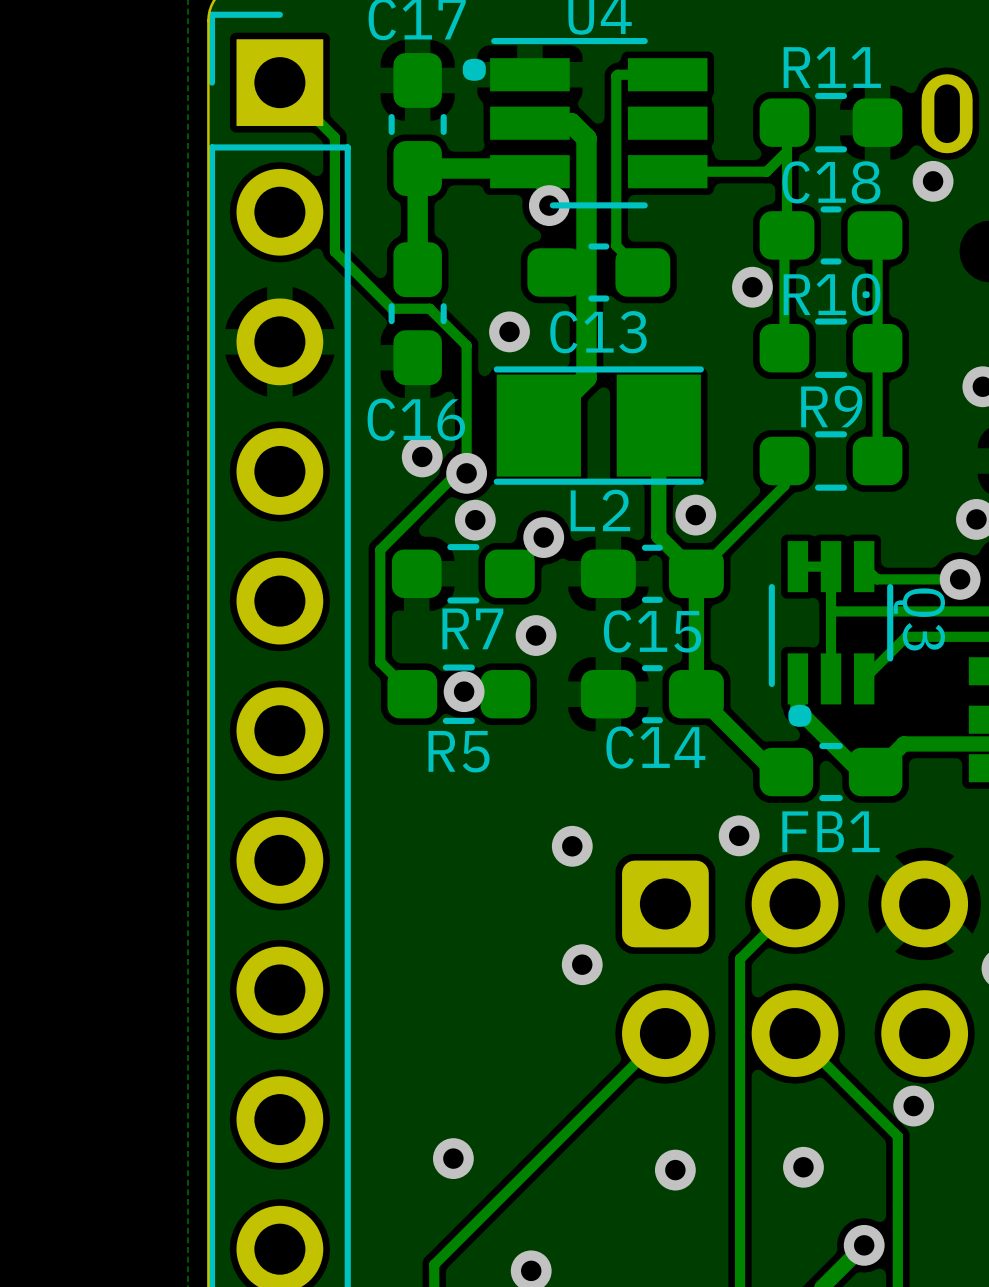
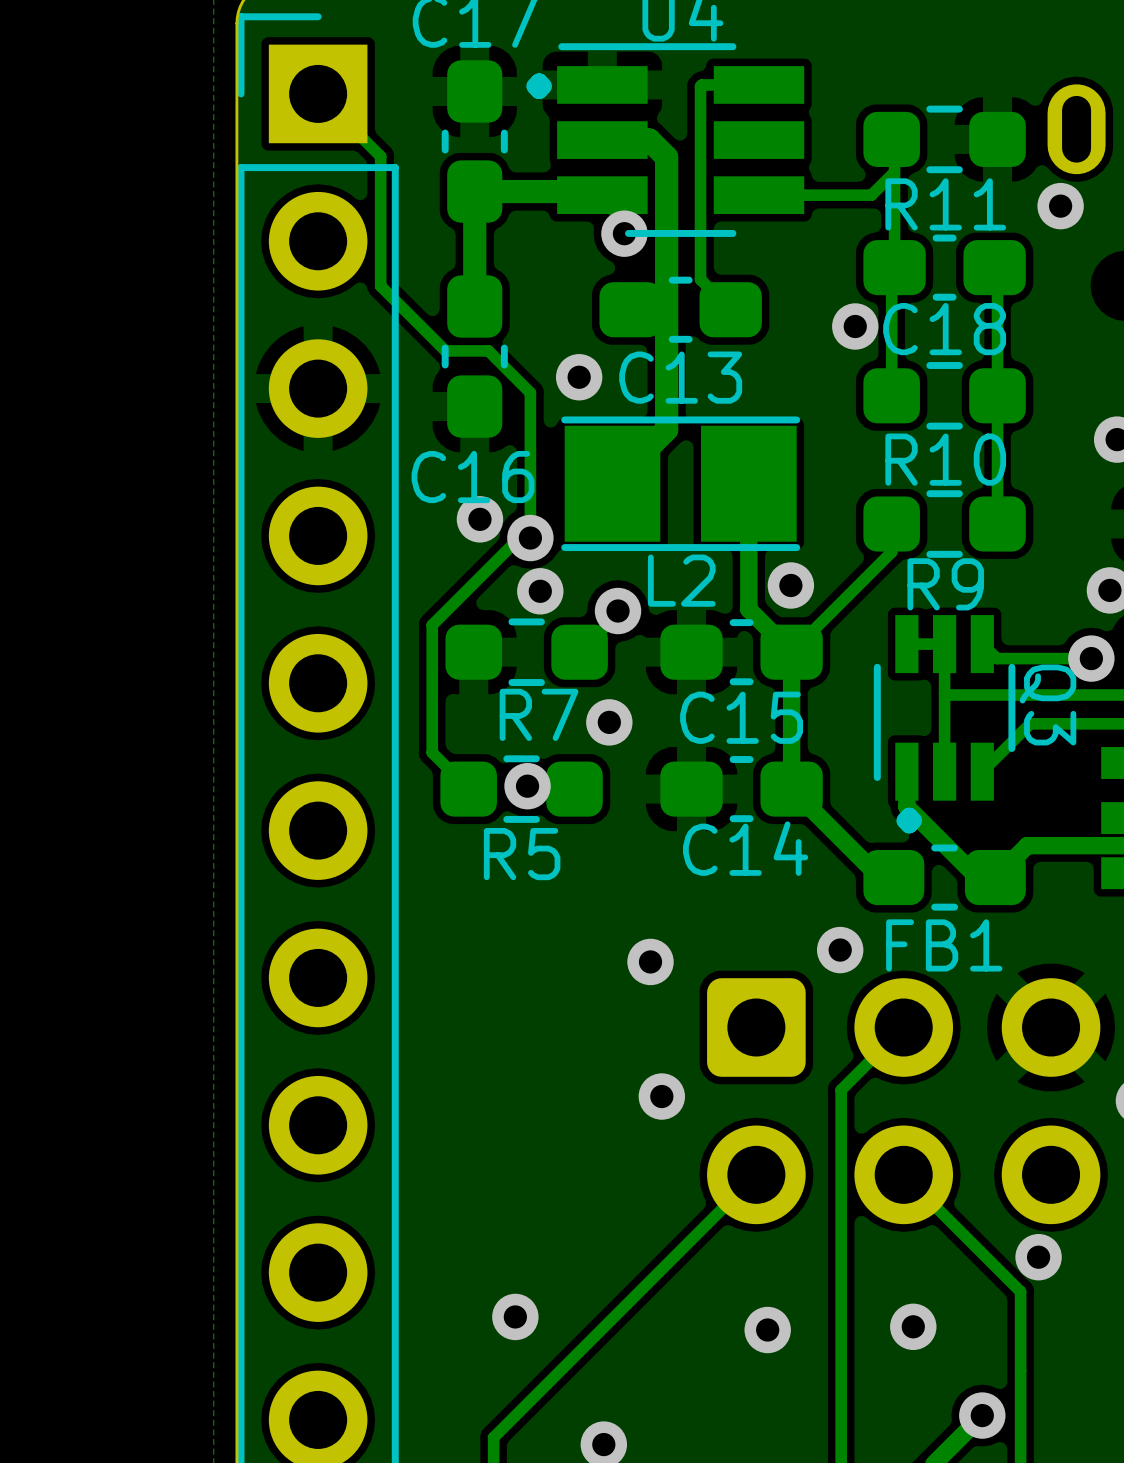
R11 name position: R11 (832, 67) -> R11 (945, 204)
C18 name position: C18 (831, 182) -> C18 (944, 329)
R10 name position: R10 (832, 294) -> R10 (945, 459)
R9 name position: R9 (831, 406) -> R9 (945, 584)

